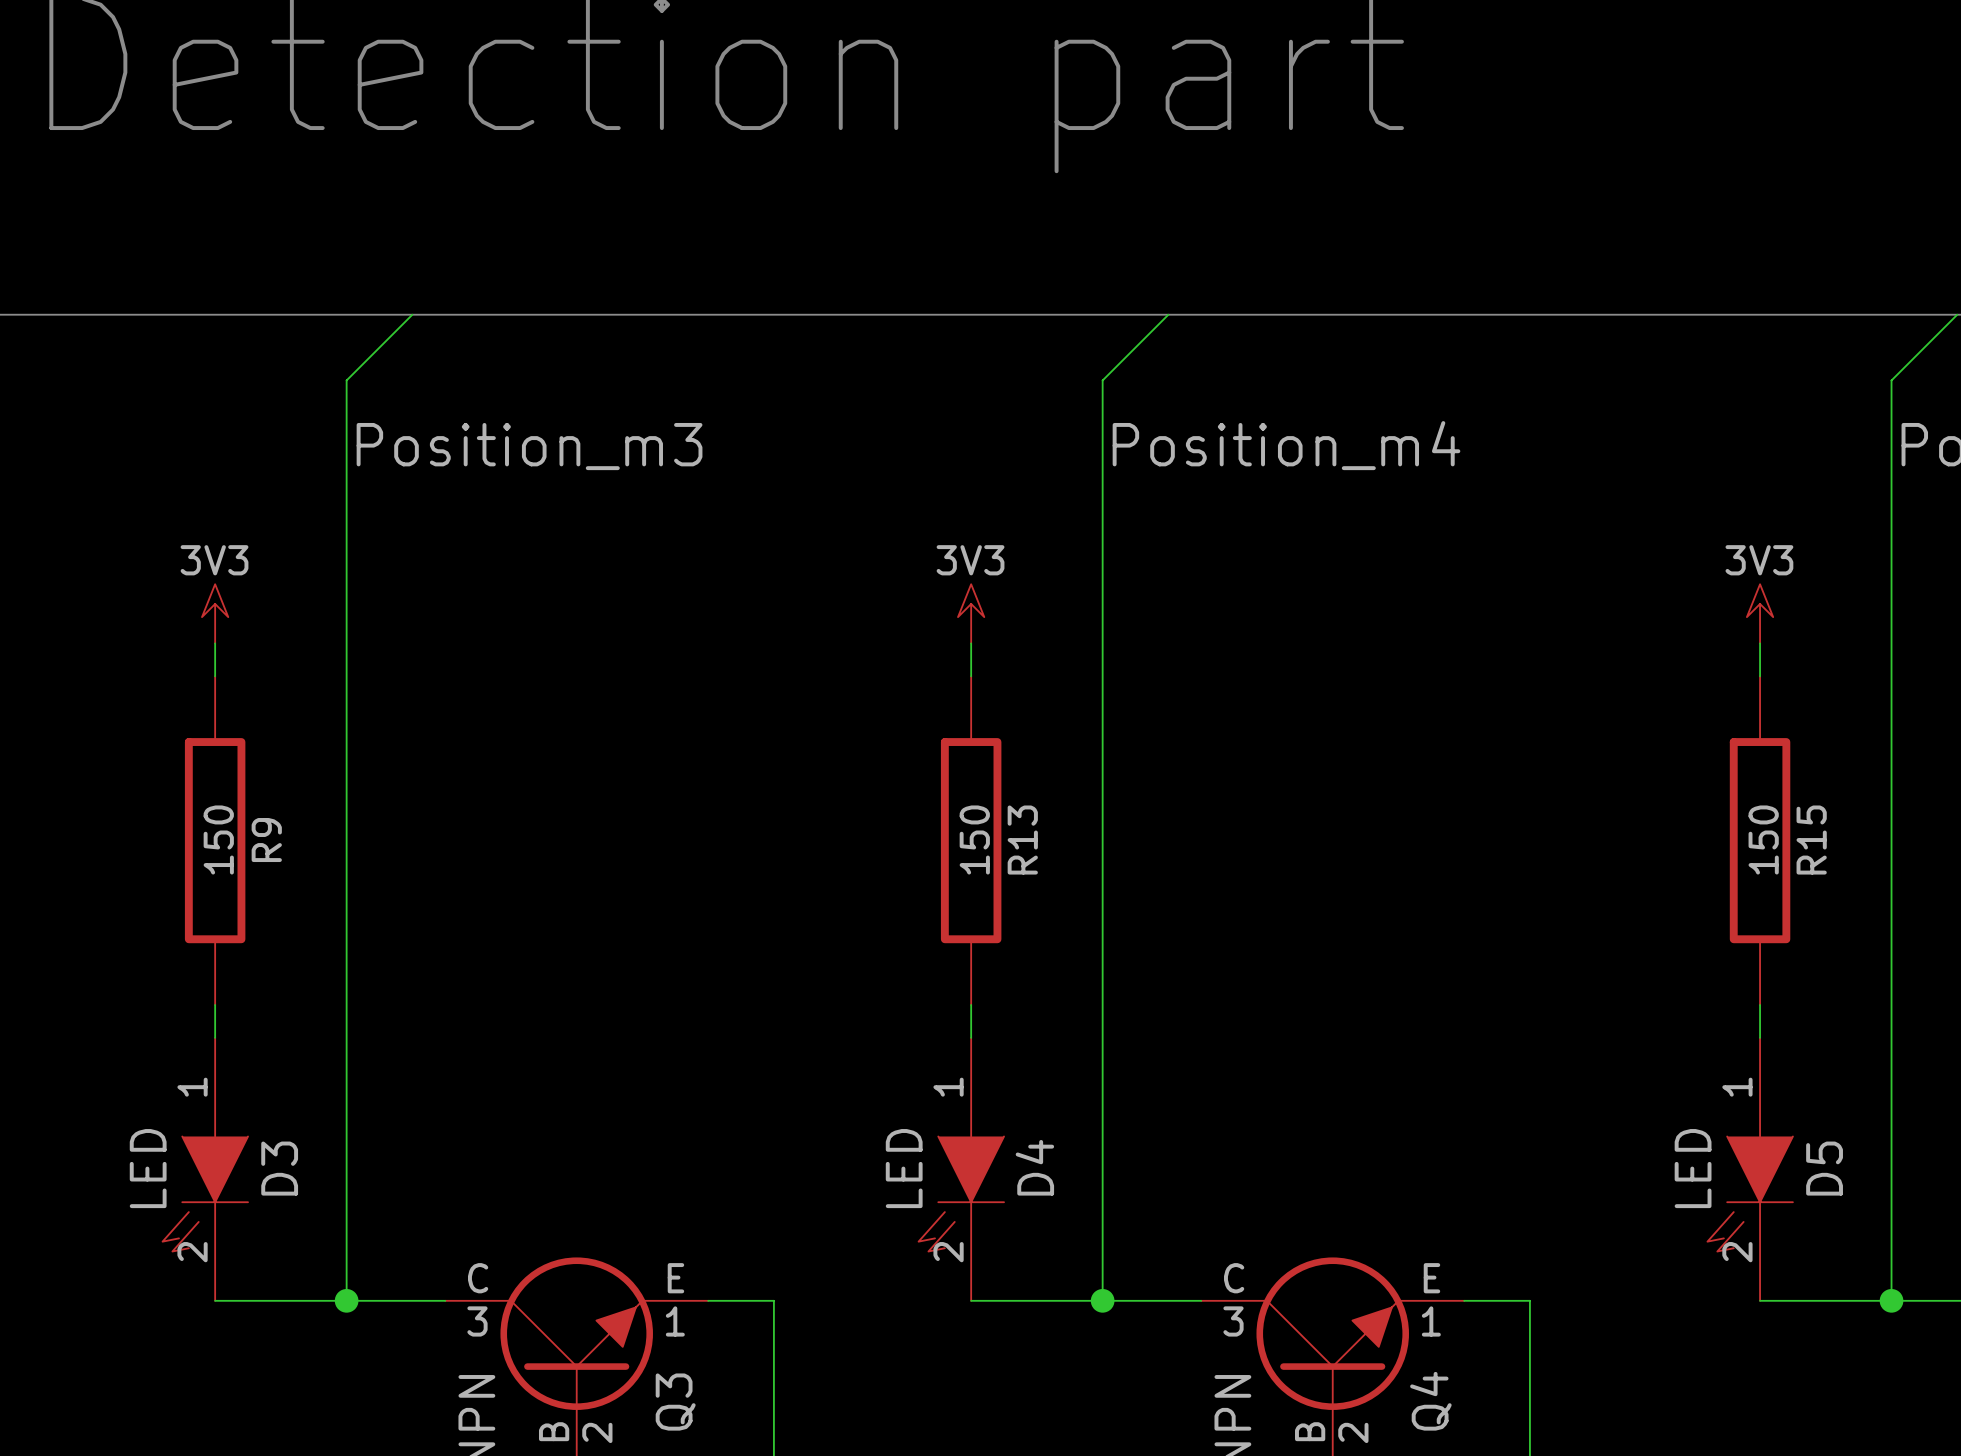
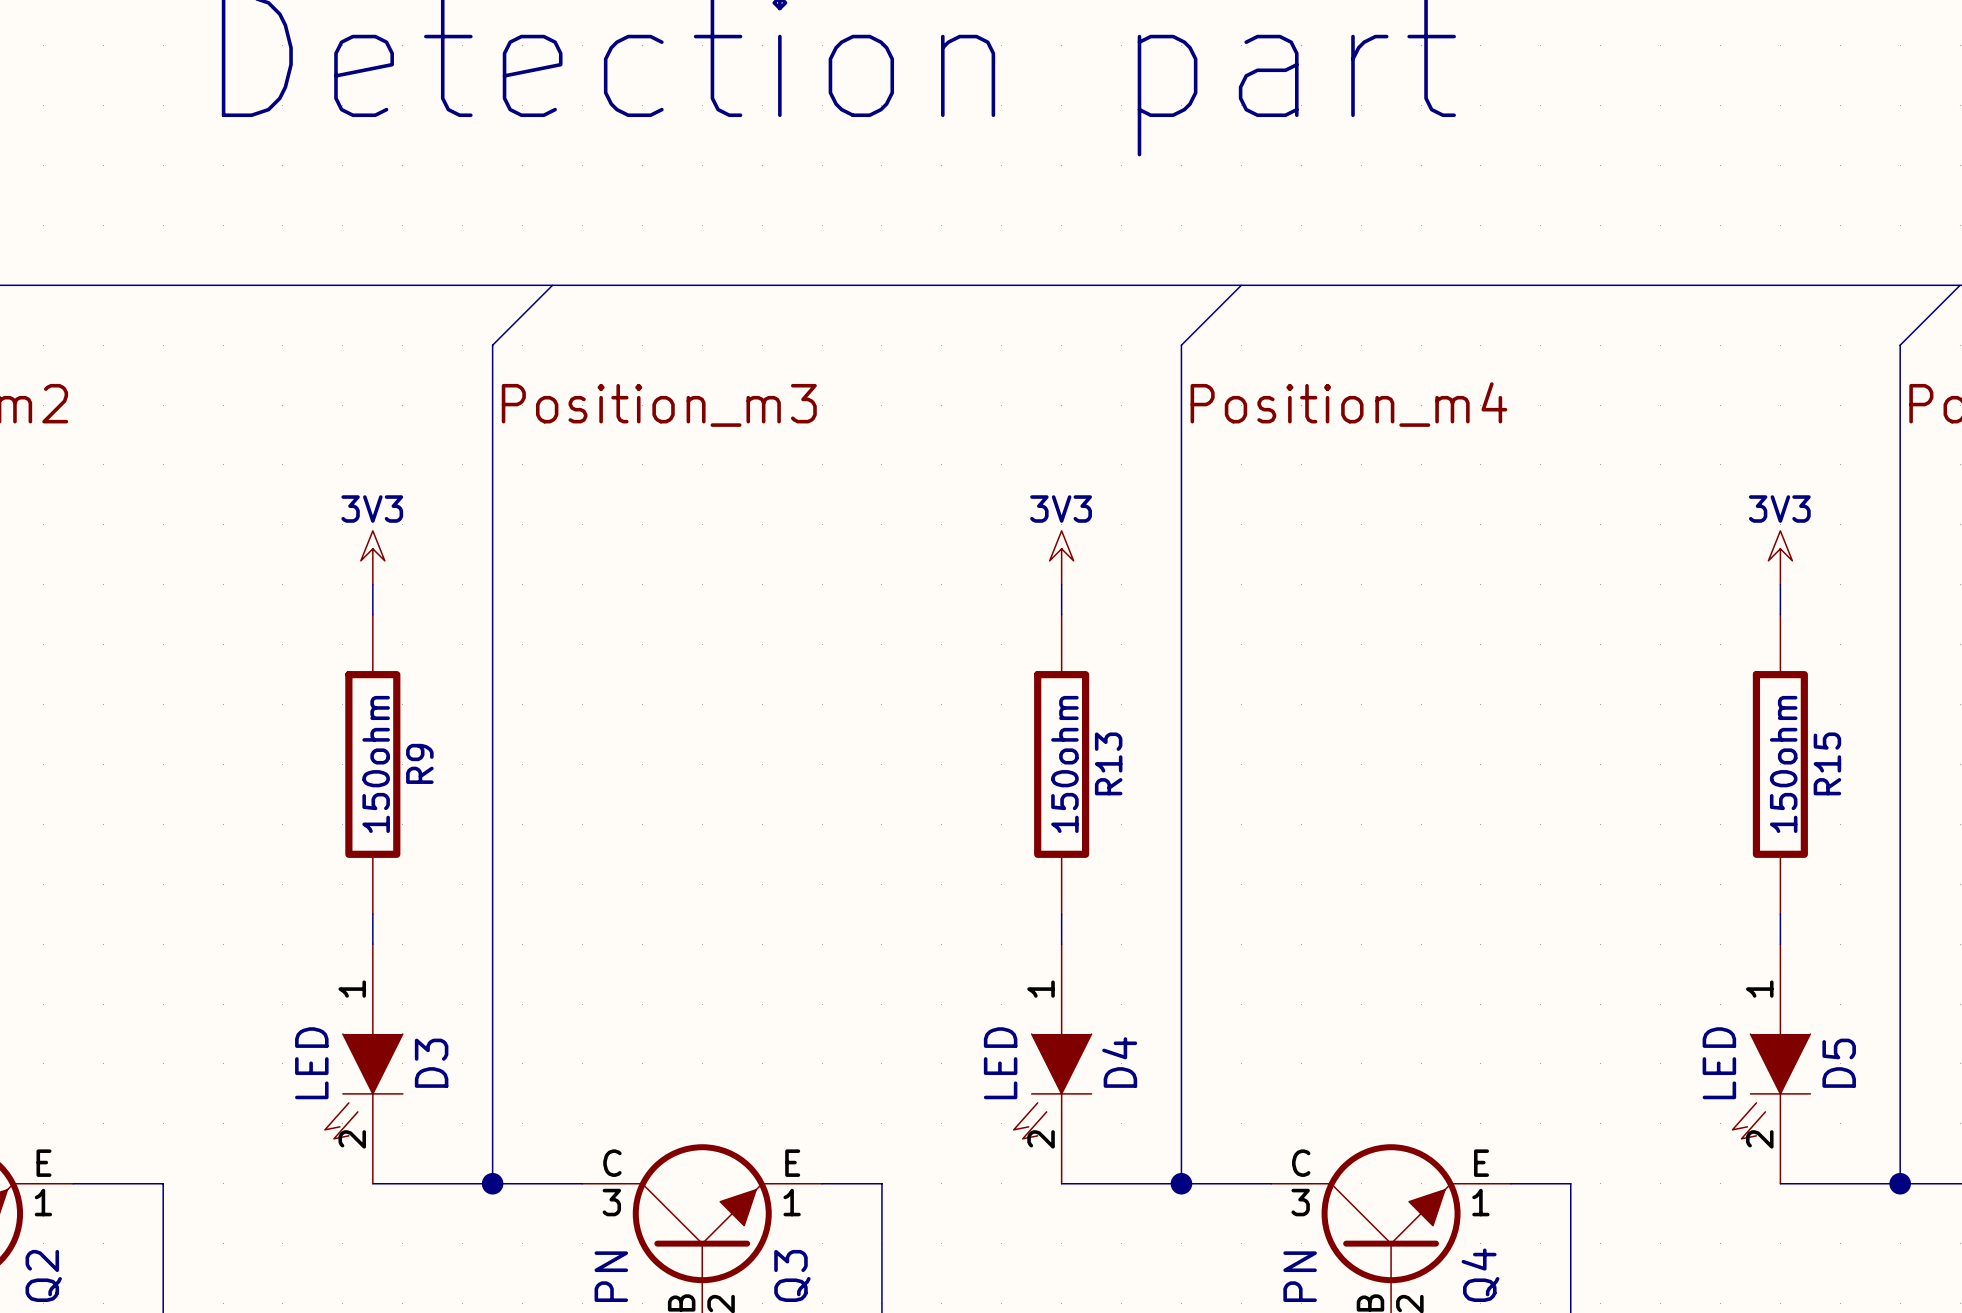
R9 value: 150 (218, 839) -> 150ohm (376, 764)
R13 value: 150 (974, 839) -> 150ohm (1064, 764)
R15 value: 150 (1763, 839) -> 150ohm (1783, 764)

